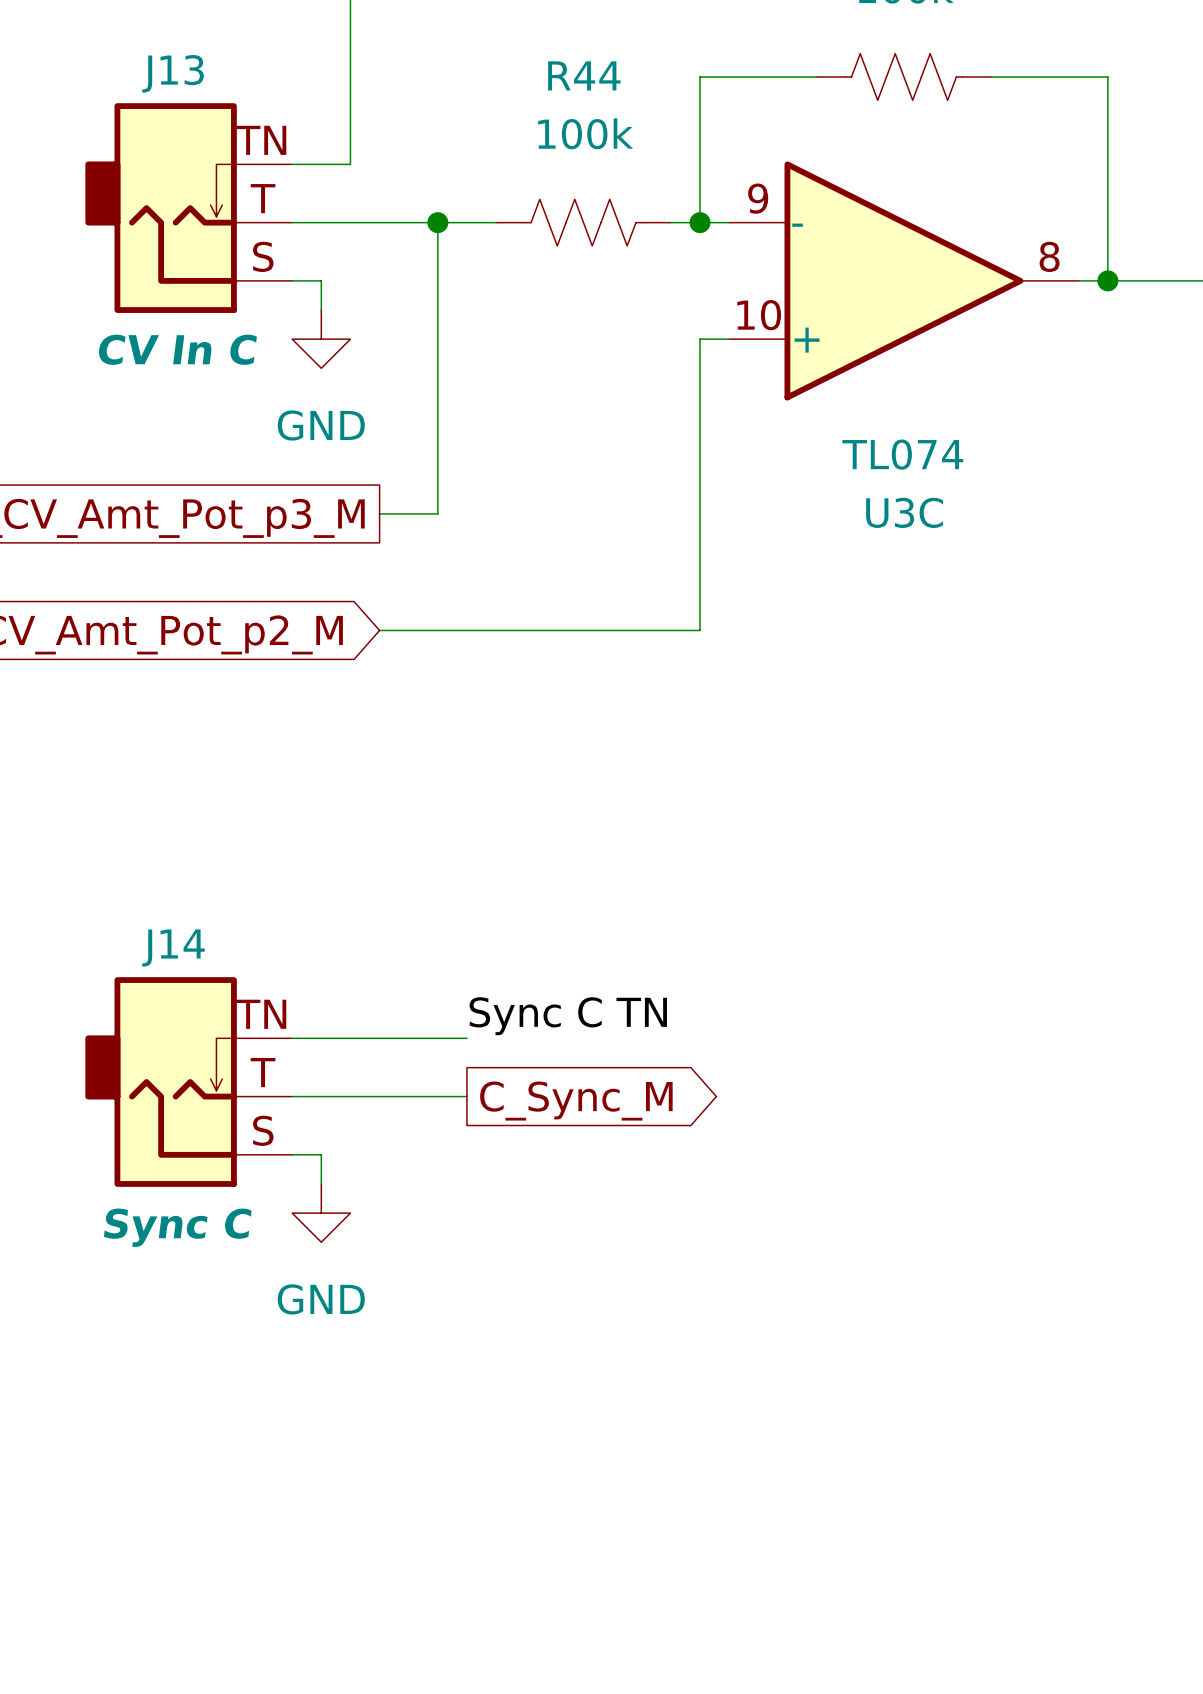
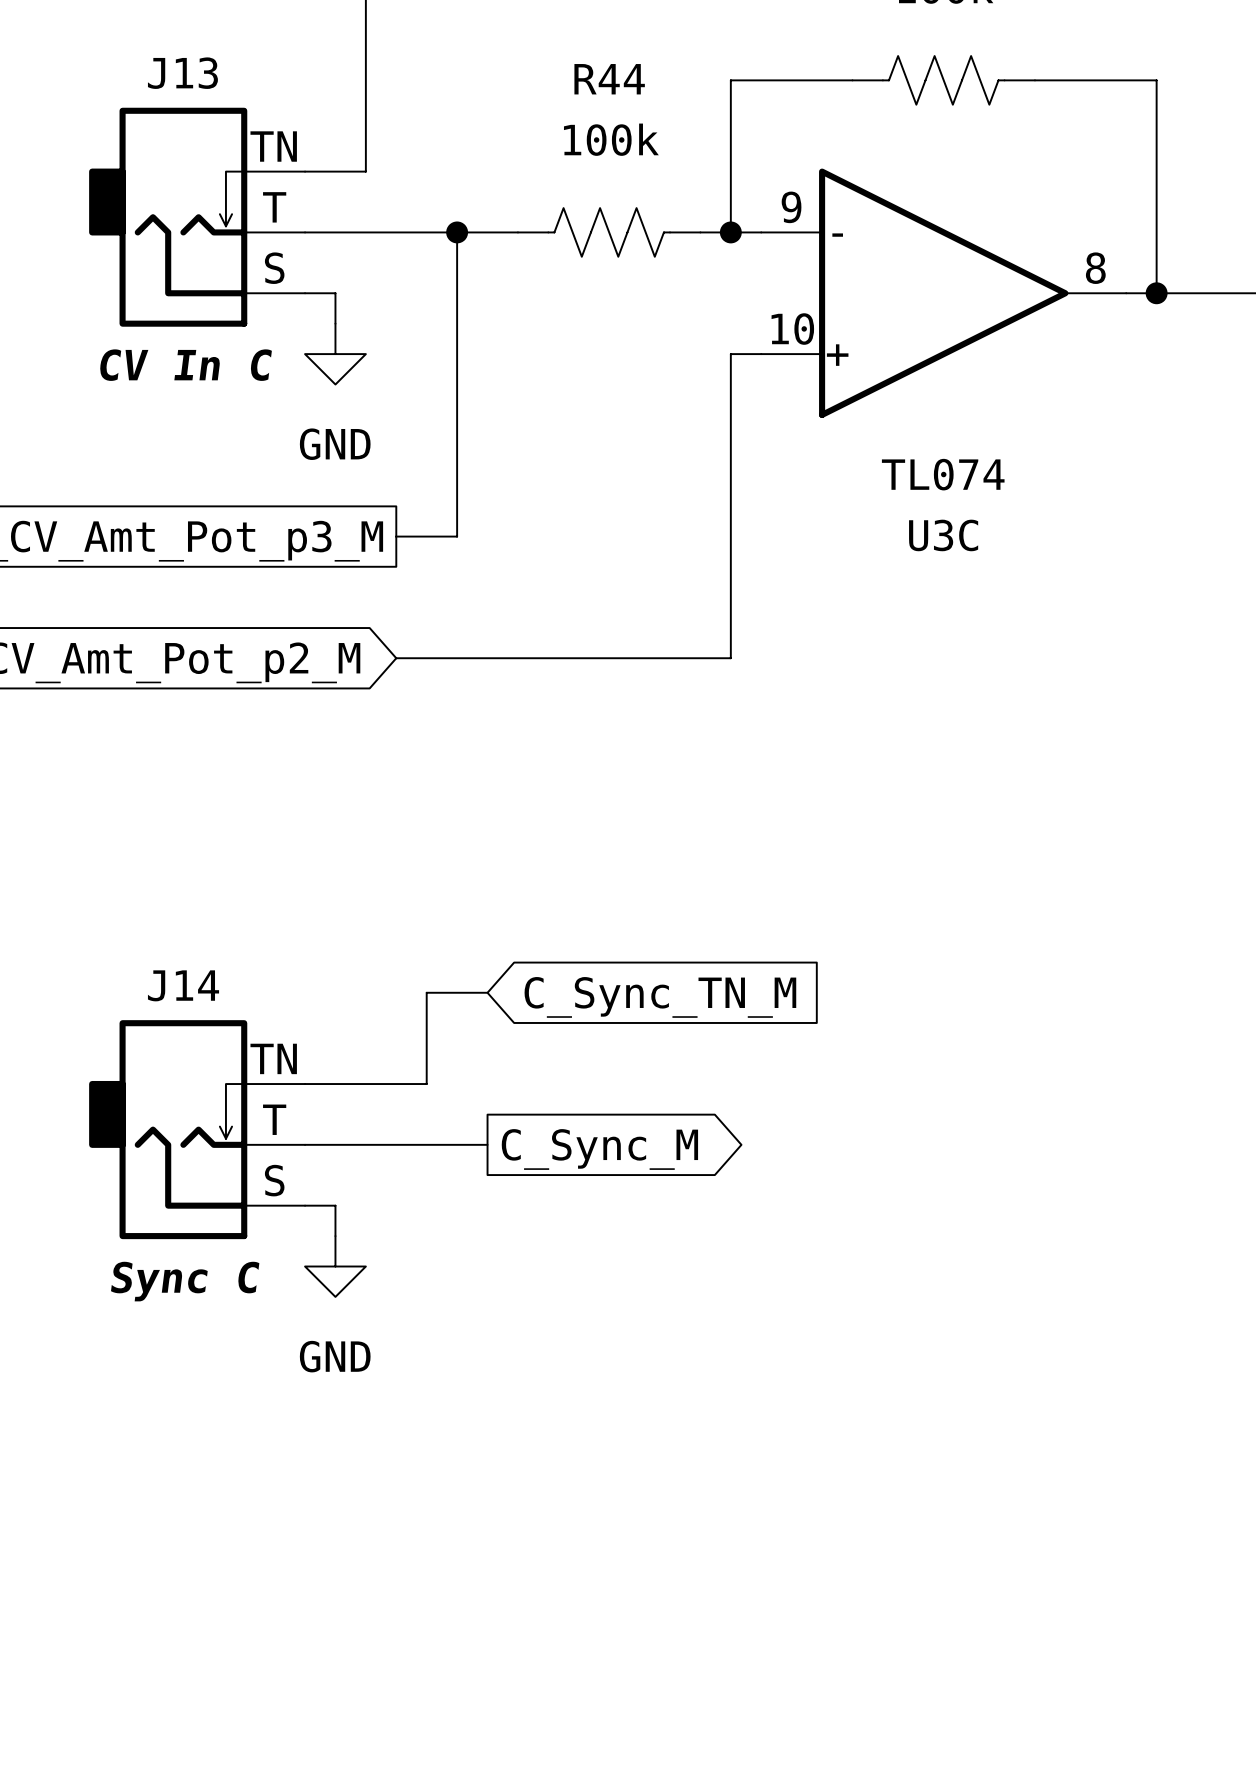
global label: none -> C_Sync_TN_M (660, 997)
label: Sync C TN (568, 1016) -> none
wire: (408, 1038) (466, 1038) -> (426, 1084) (426, 992) (487, 992)

